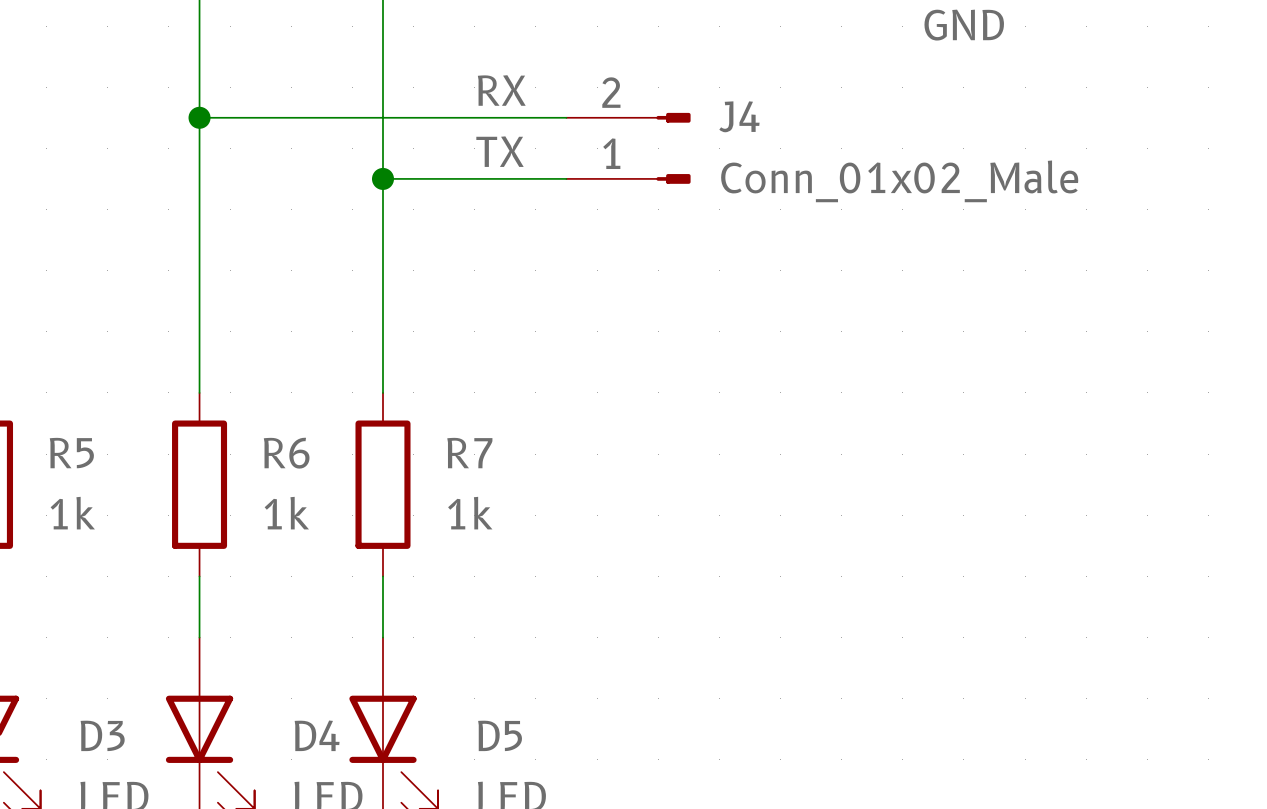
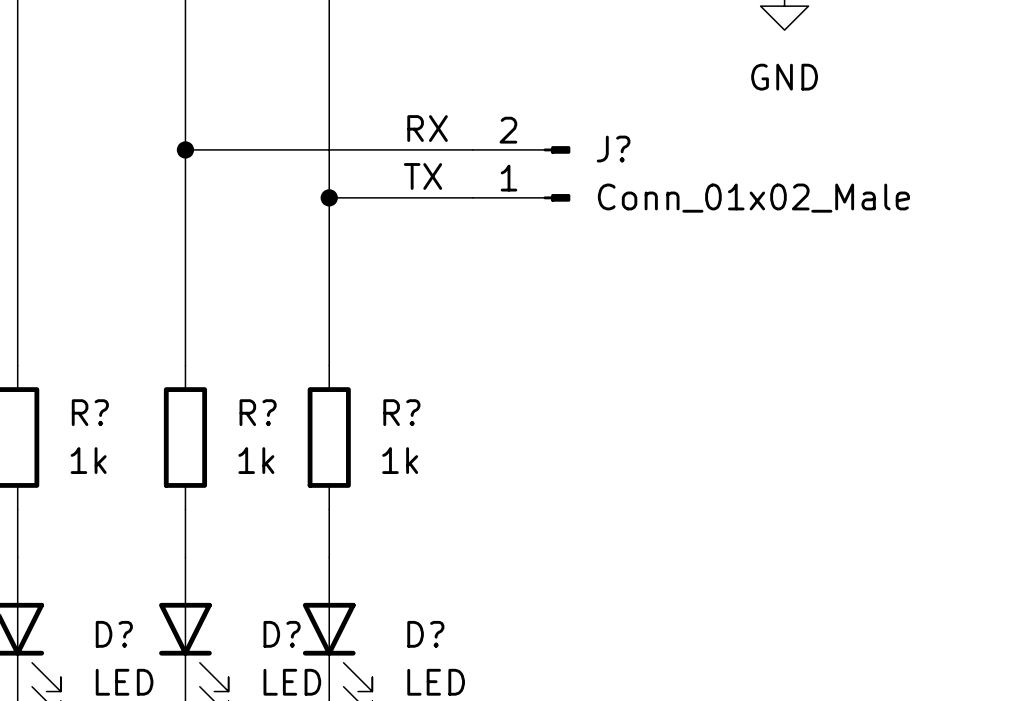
J4 name: J4 (739, 116) -> J? (613, 149)
R5 name: R5 (71, 453) -> R? (90, 412)
R6 name: R6 (286, 453) -> R? (258, 412)
R7 name: R7 (469, 453) -> R? (401, 412)
D3 name: D3 (102, 735) -> D? (114, 634)
D4 name: D4 (317, 735) -> D? (282, 634)
D5 name: D5 (500, 735) -> D? (425, 634)

